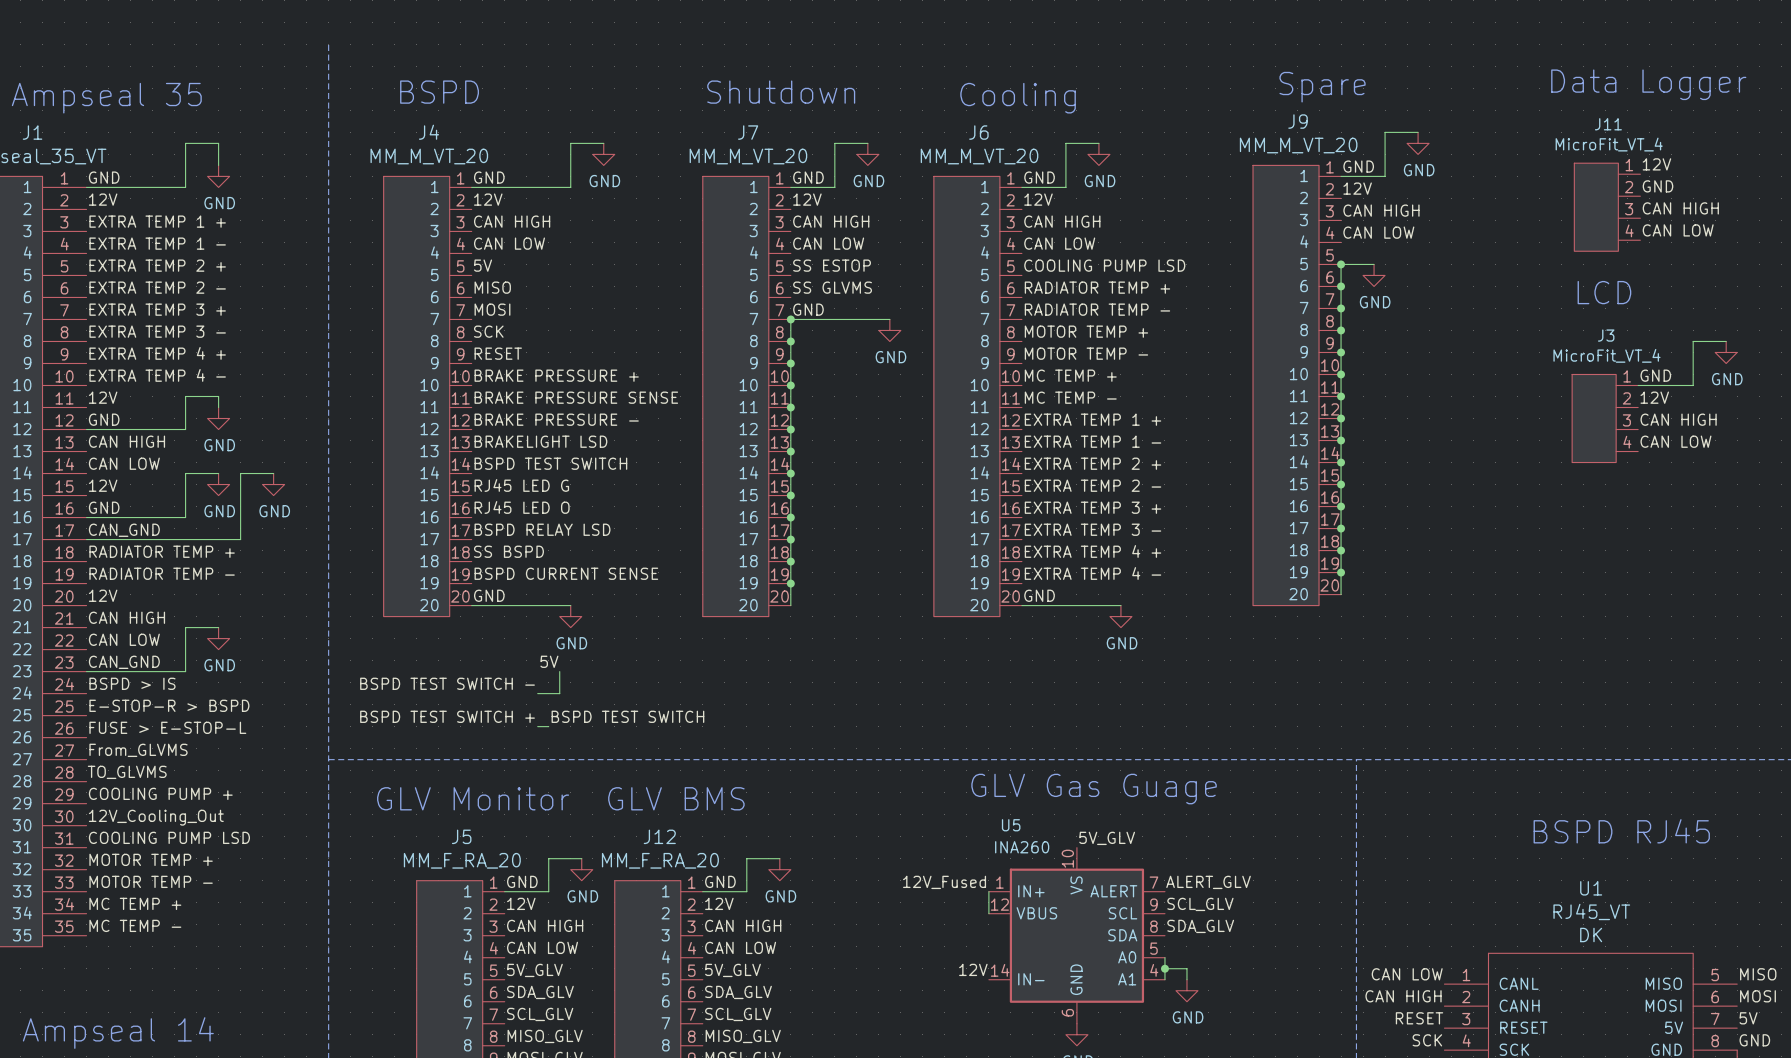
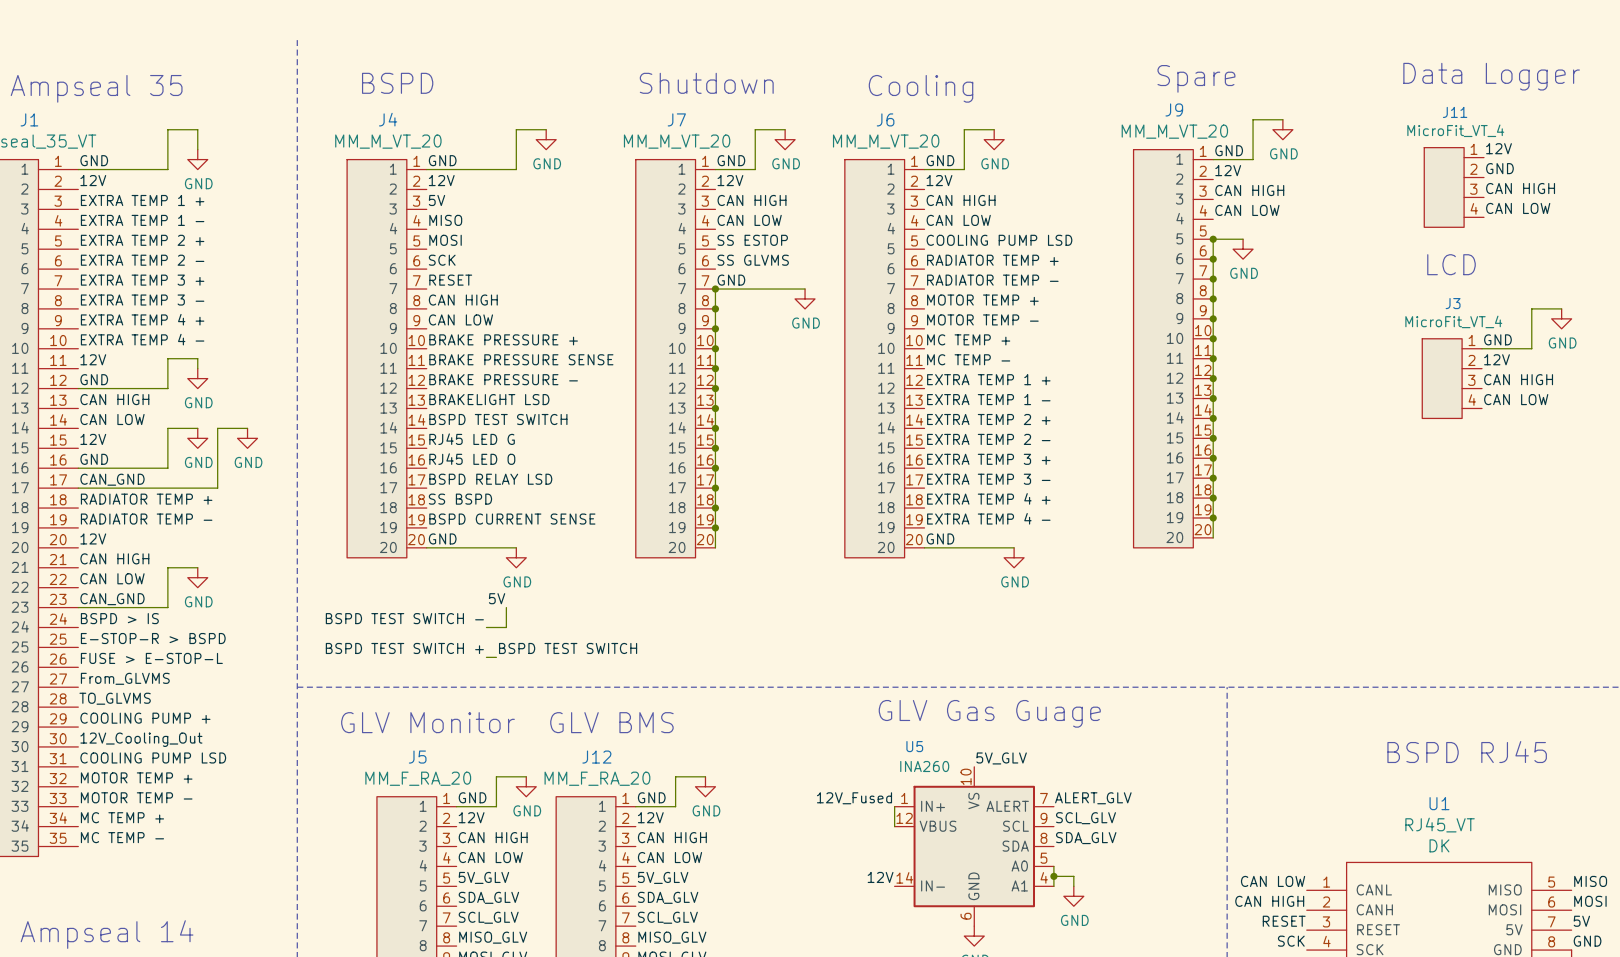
label: CAN HIGH (512, 221) -> 5V (436, 200)
label: CAN LOW (509, 243) -> MISO (445, 220)
label: 5V (483, 265) -> MOSI (445, 240)
label: MISO (492, 287) -> SCK (442, 260)
label: MOSI (492, 309) -> RESET (450, 280)
label: SCK (488, 331) -> CAN HIGH (463, 300)
label: RESET (498, 353) -> CAN LOW (460, 319)

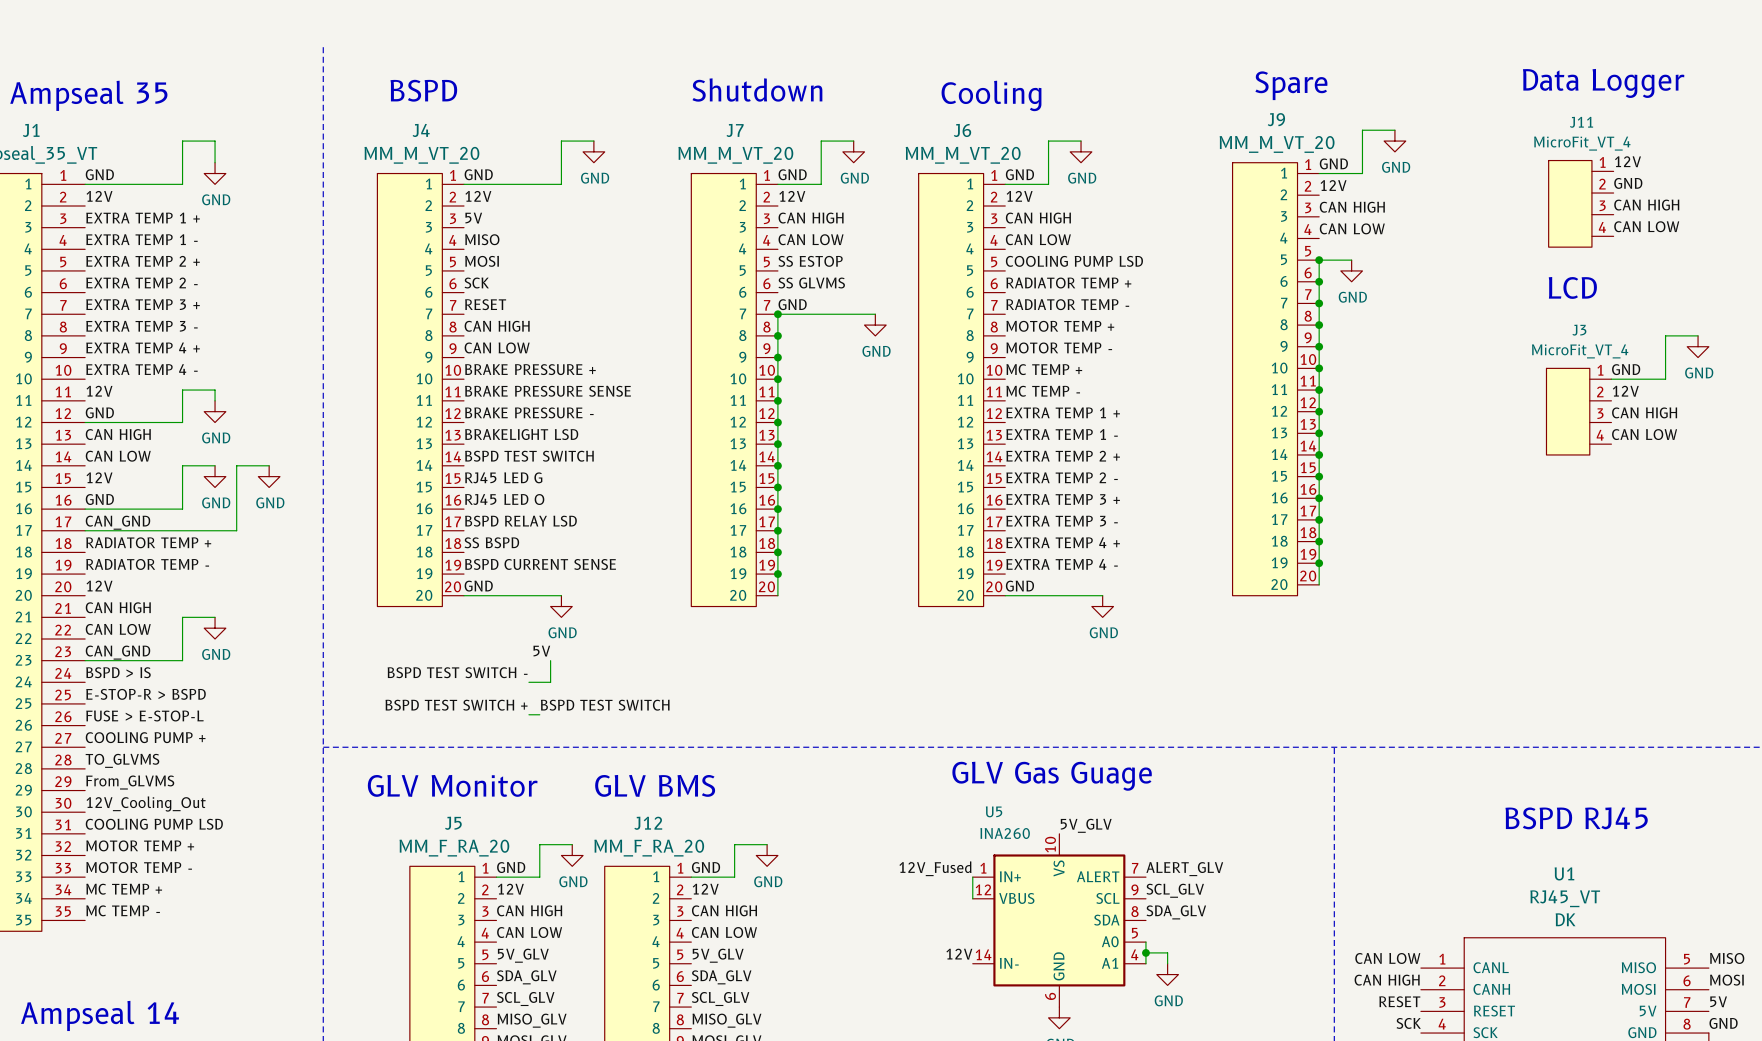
label: From_GLVMS (125, 678) -> COOLING PUMP + (145, 737)
label: COOLING PUMP + (145, 718) -> From_GLVMS (130, 782)

